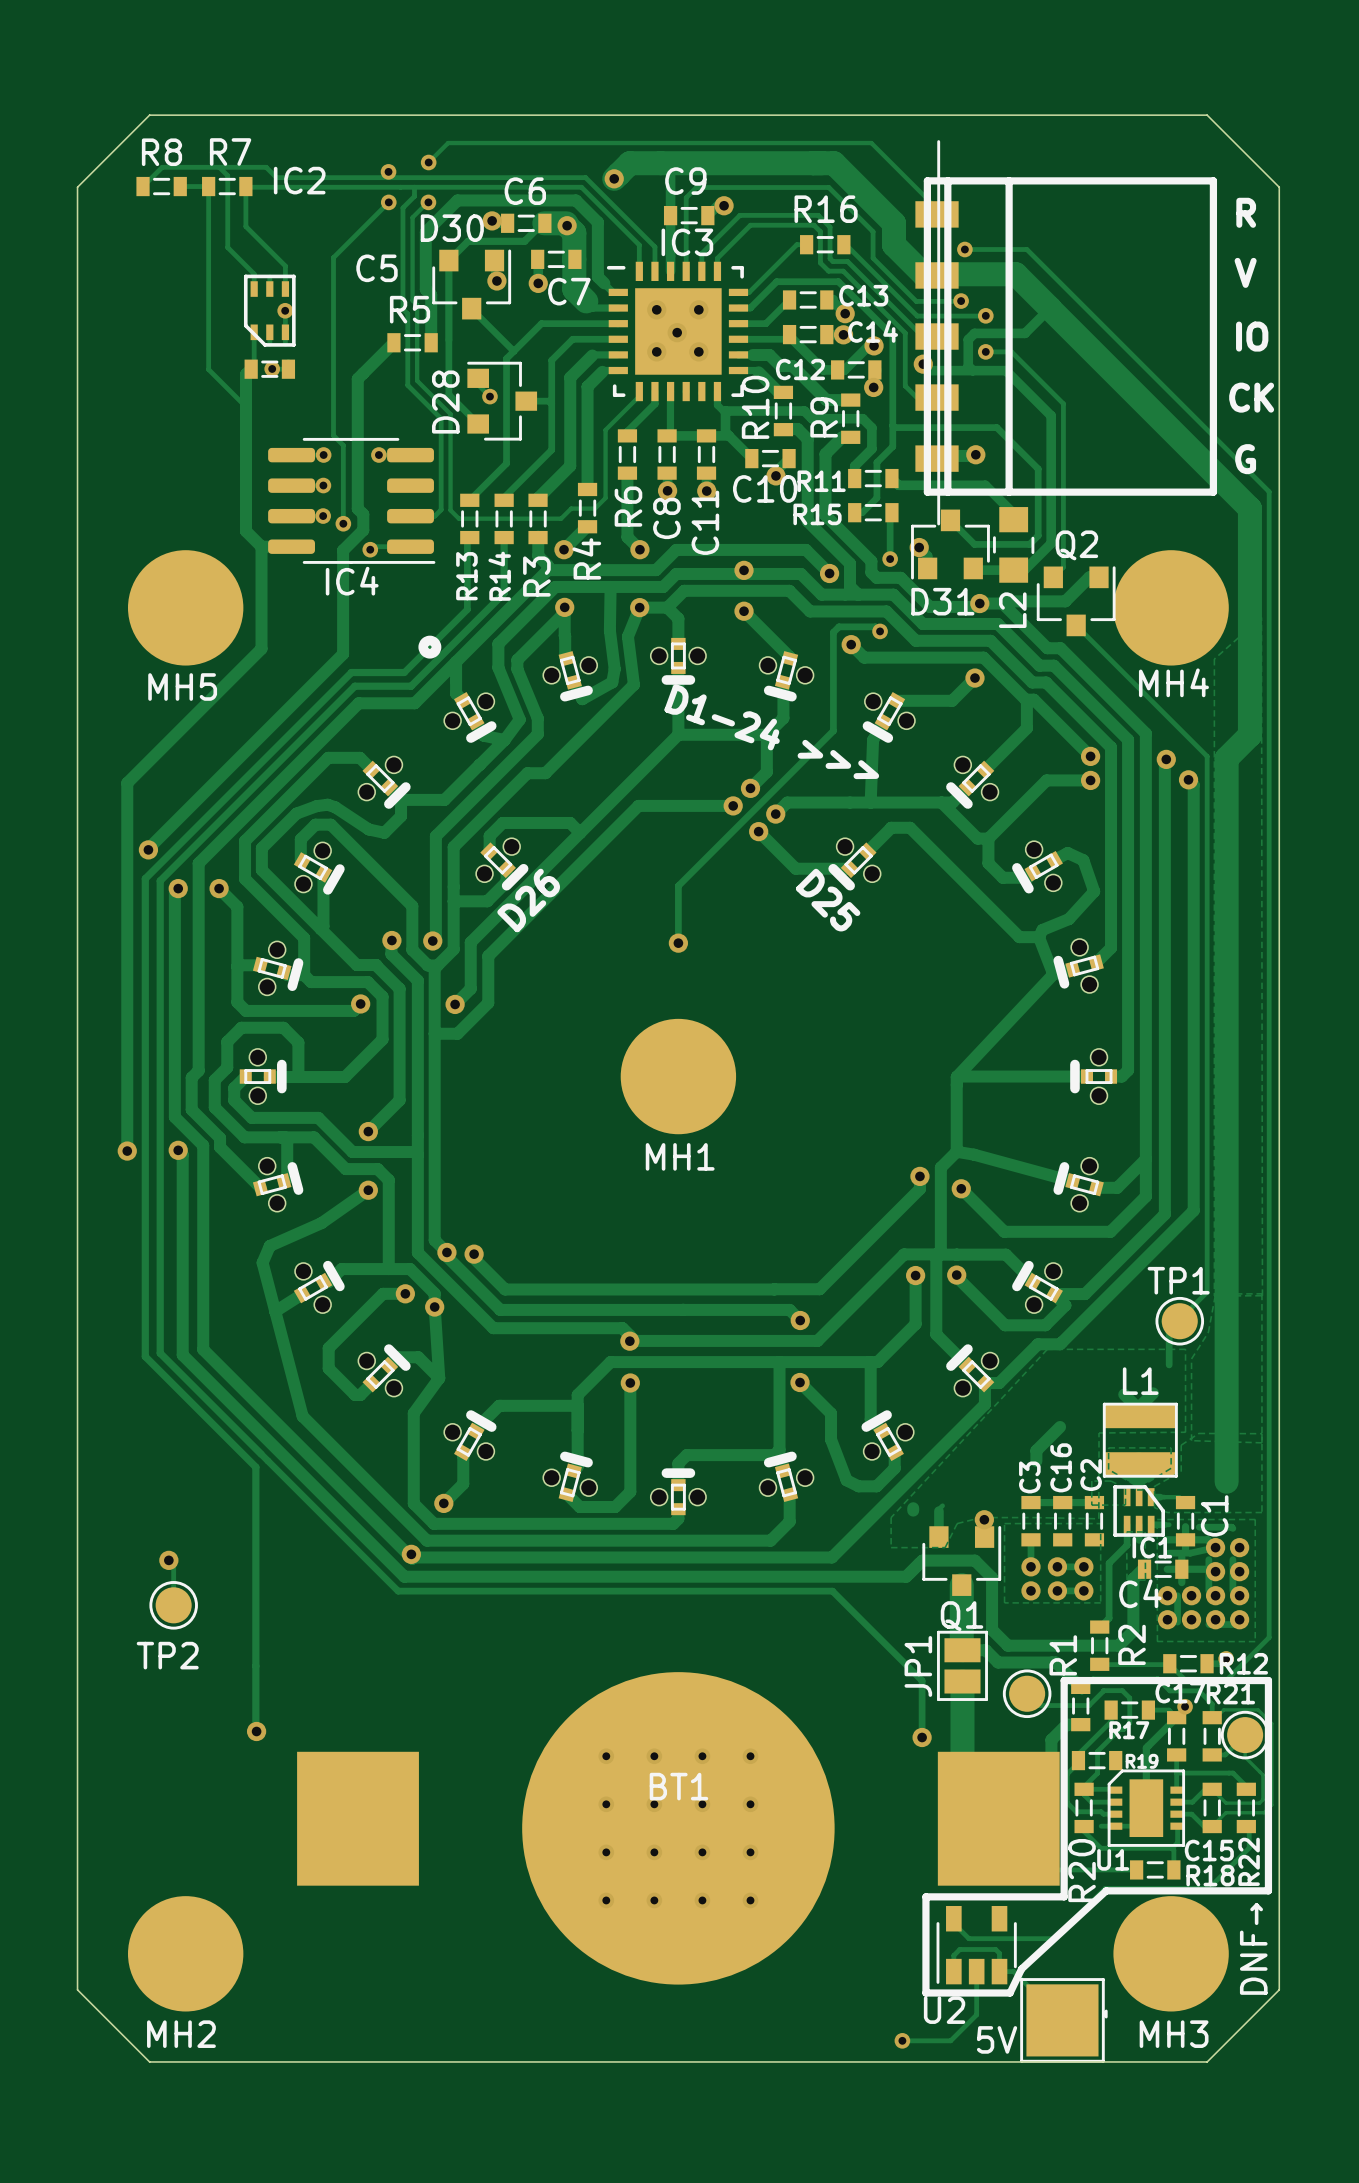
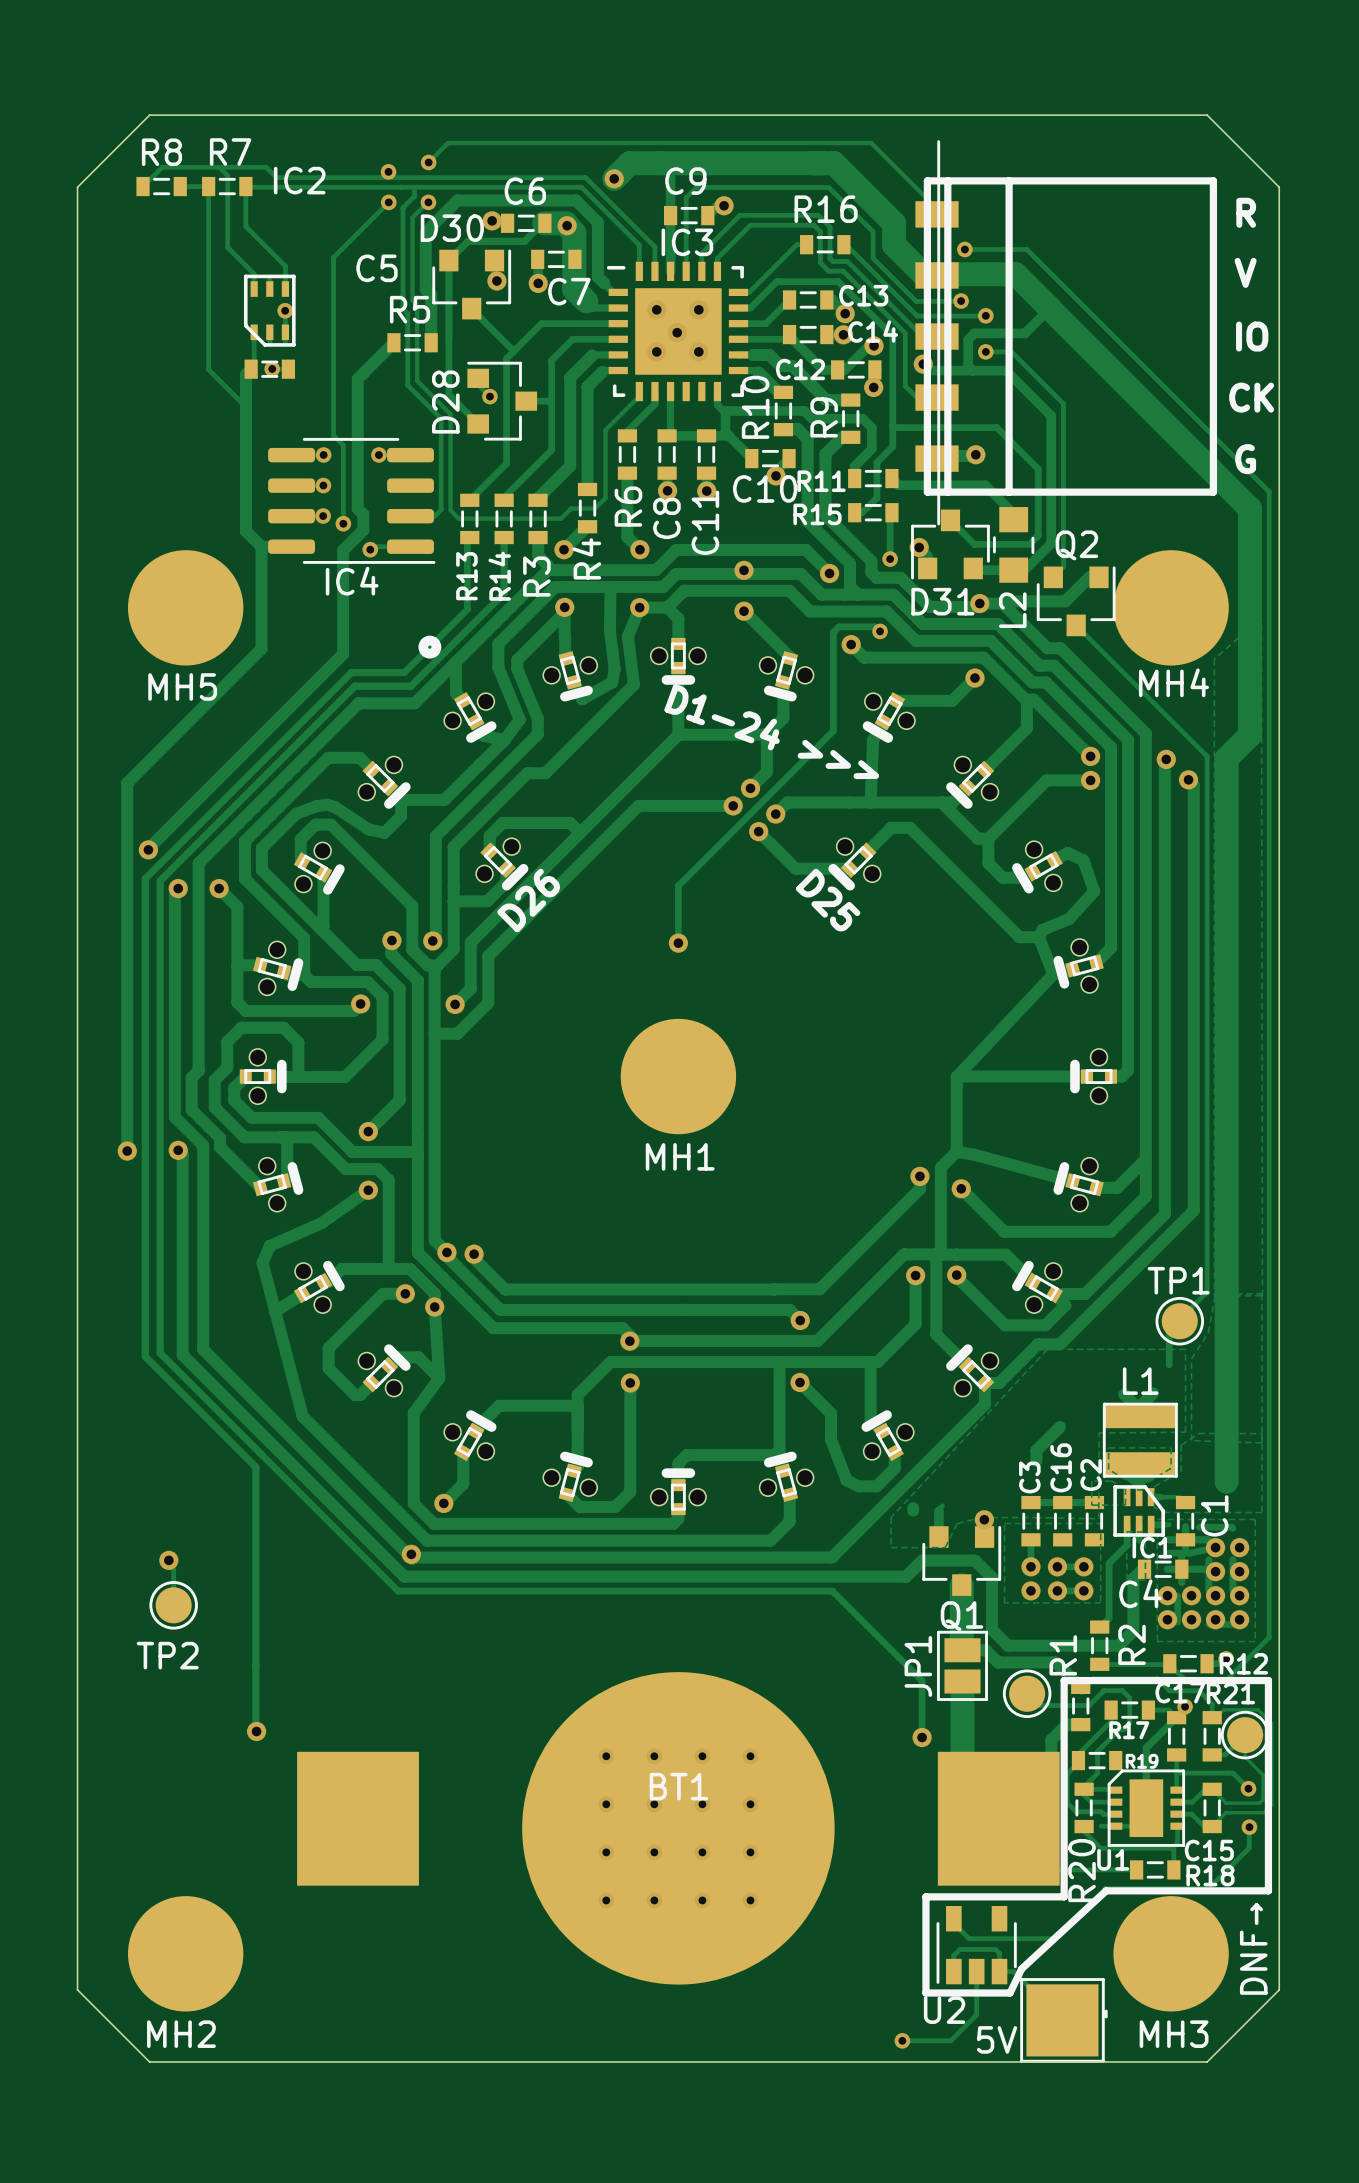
via: none -> (1248, 1788)
R22: (1246, 1807) -> none
via: none -> (1249, 1827)

